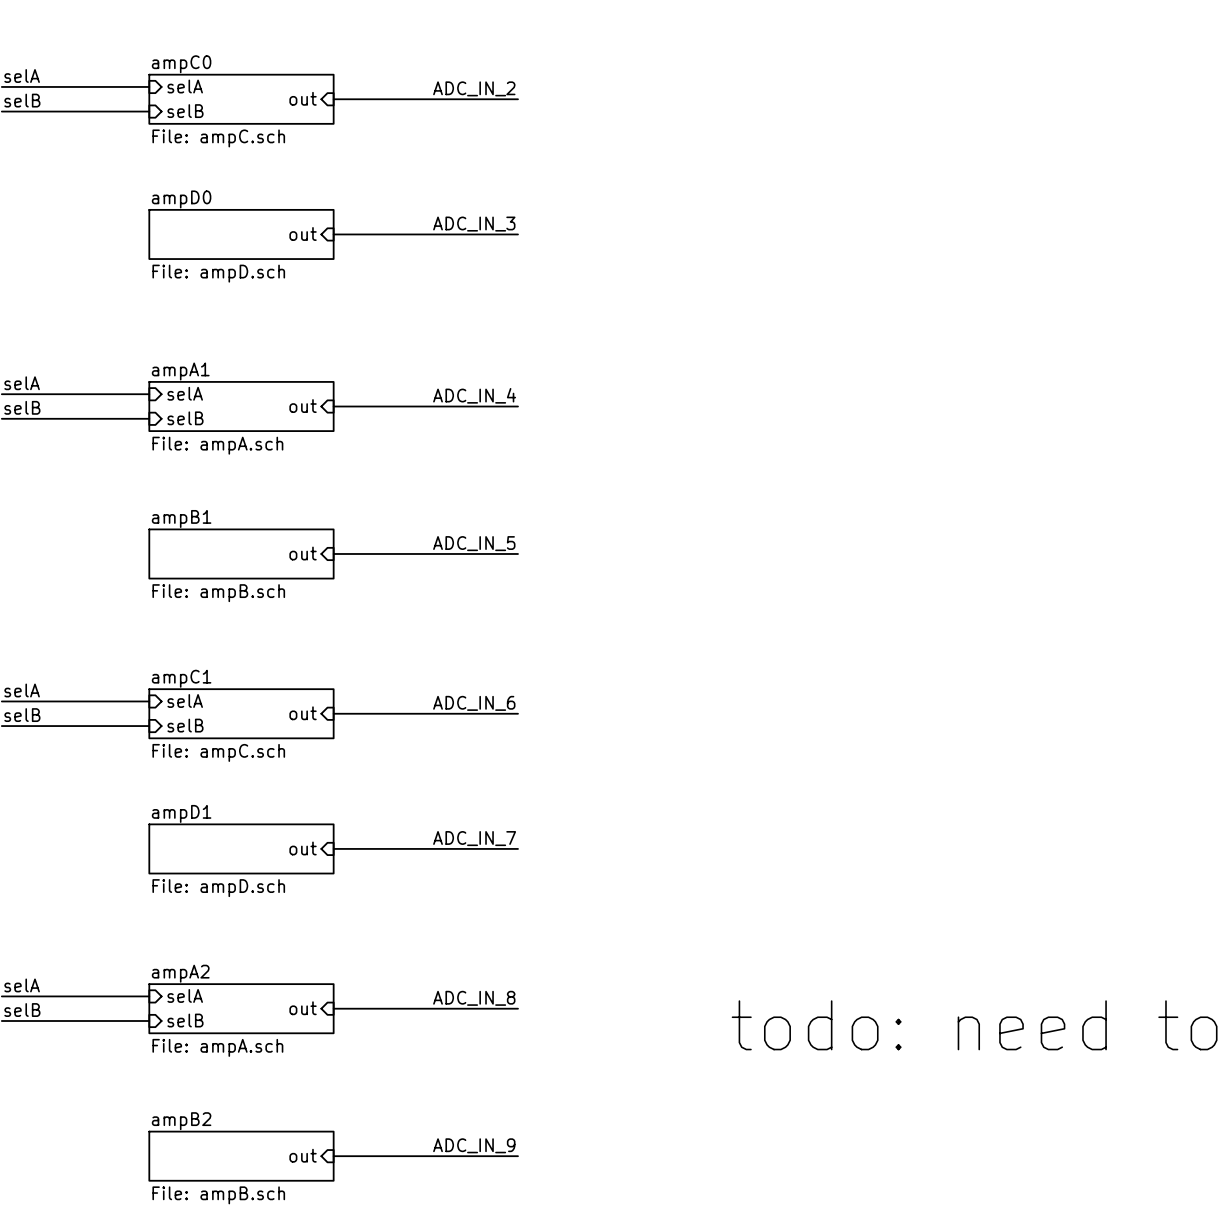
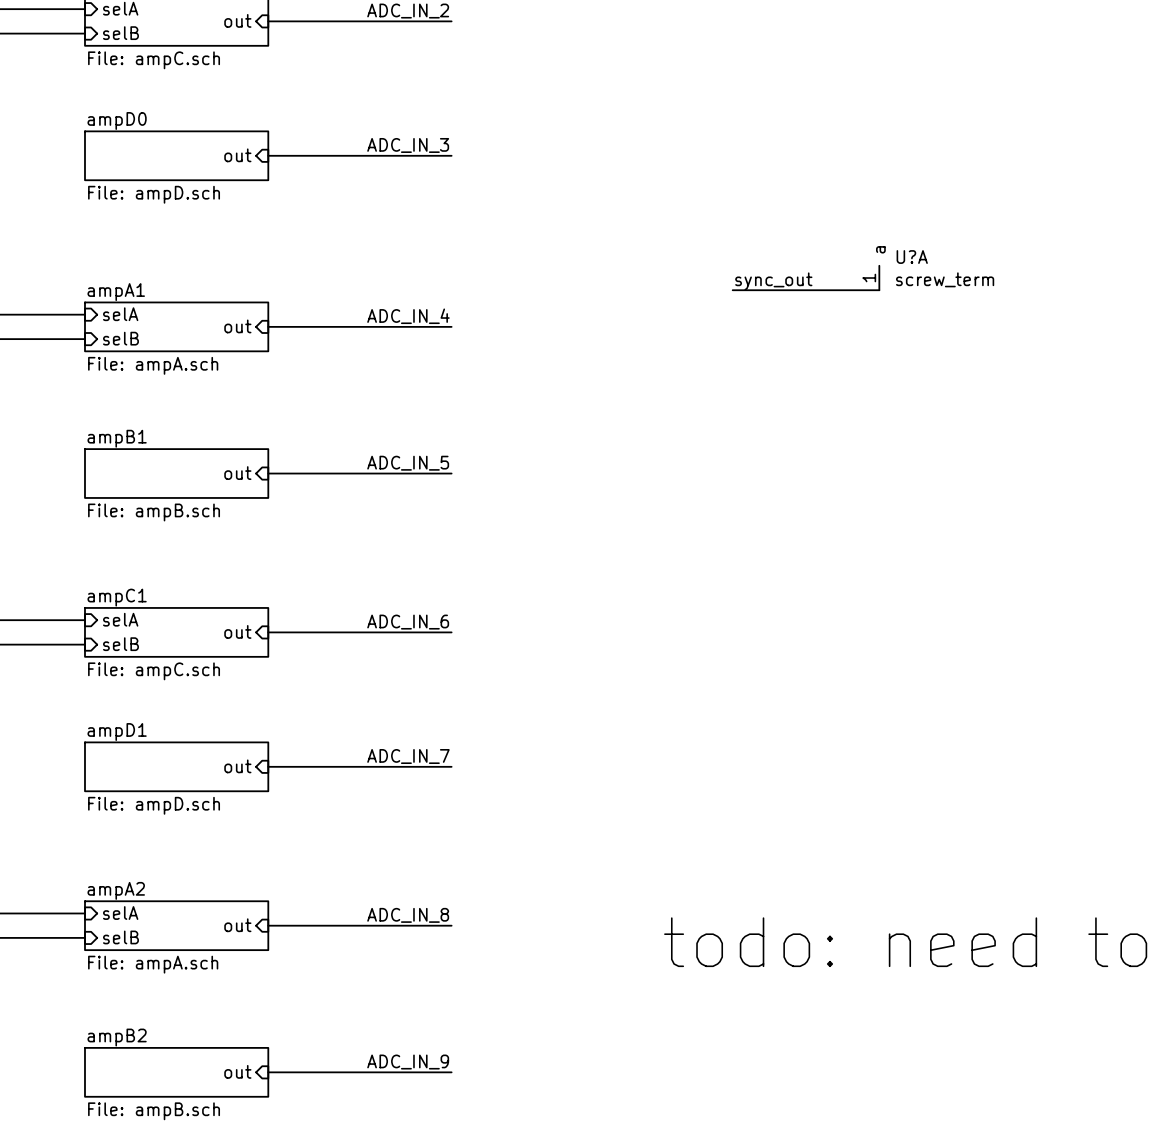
U?A: none -> screw_term (879, 278)
label: none -> sync_out (773, 281)
wire: none -> (732, 290) (879, 290)

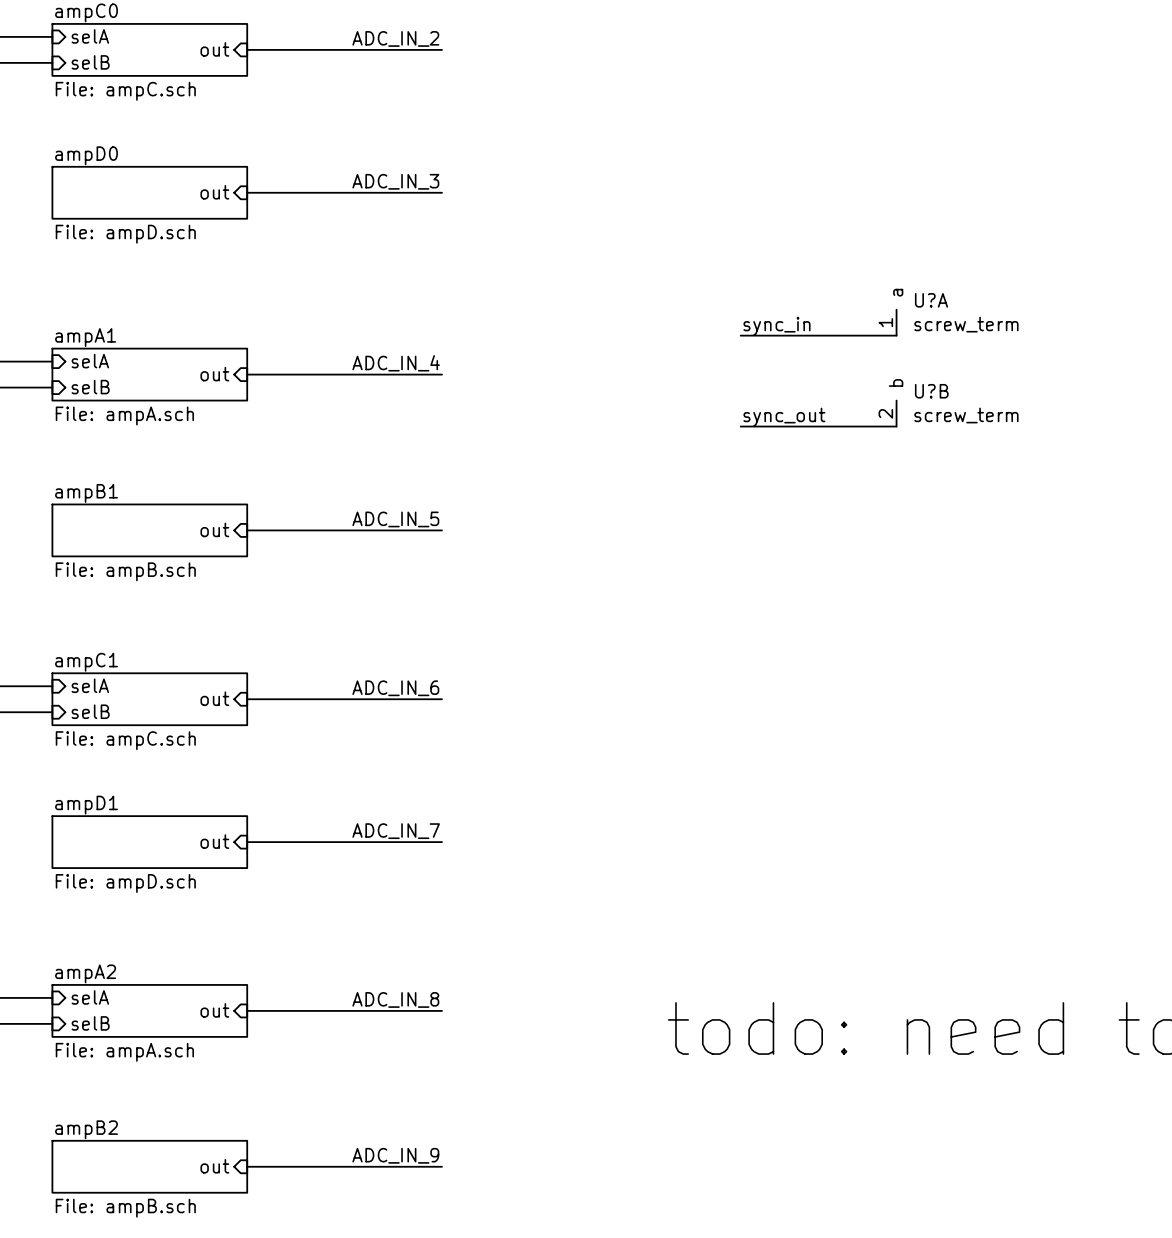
label: sync_out (773, 281) -> sync_in (776, 326)
U?B: none -> screw_term (896, 413)
label: none -> sync_out (784, 417)
wire: none -> (740, 426) (896, 426)

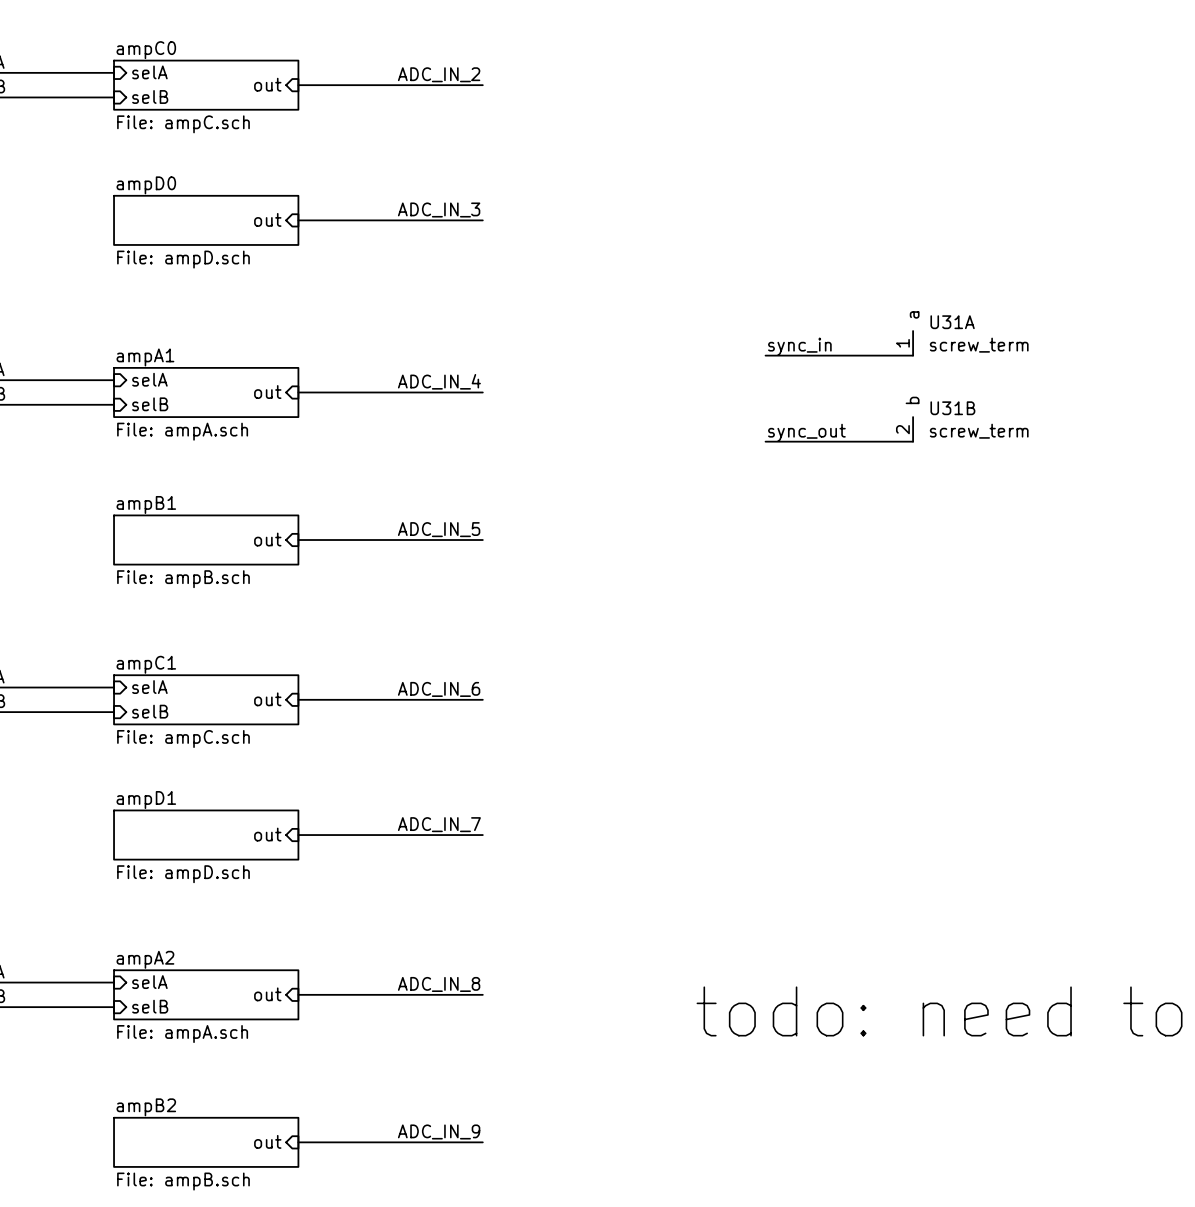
U?A name: U?A (931, 300) -> U31A (952, 322)
U?B name: U?B (931, 391) -> U31B (952, 408)

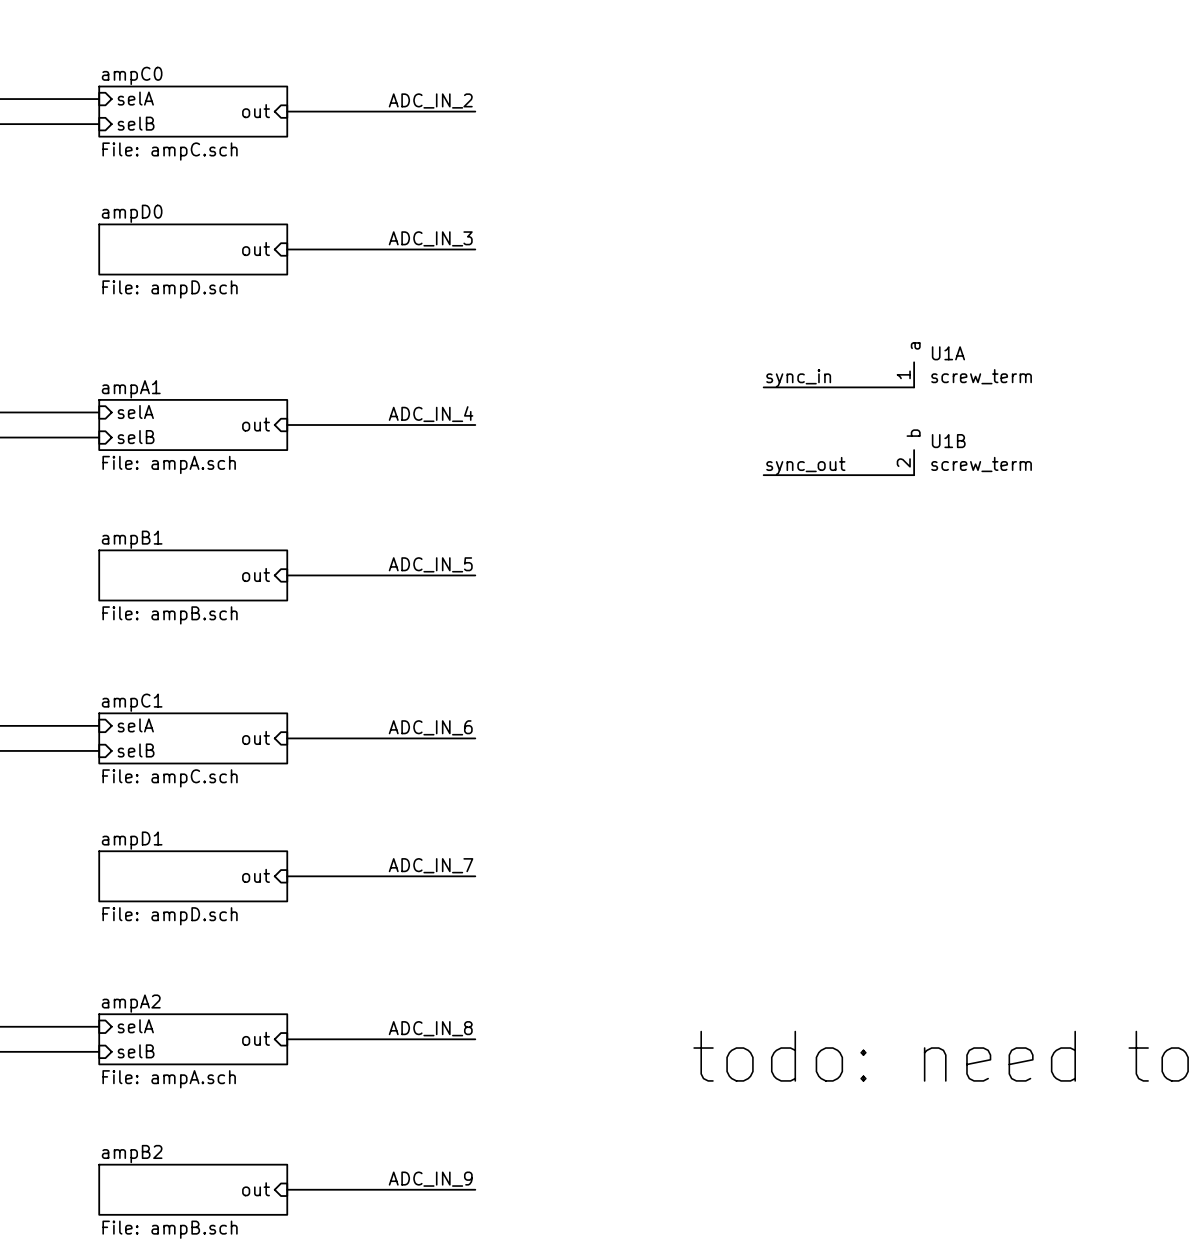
U31A name: U31A (952, 322) -> U1A (948, 353)
U31B name: U31B (952, 408) -> U1B (948, 441)

